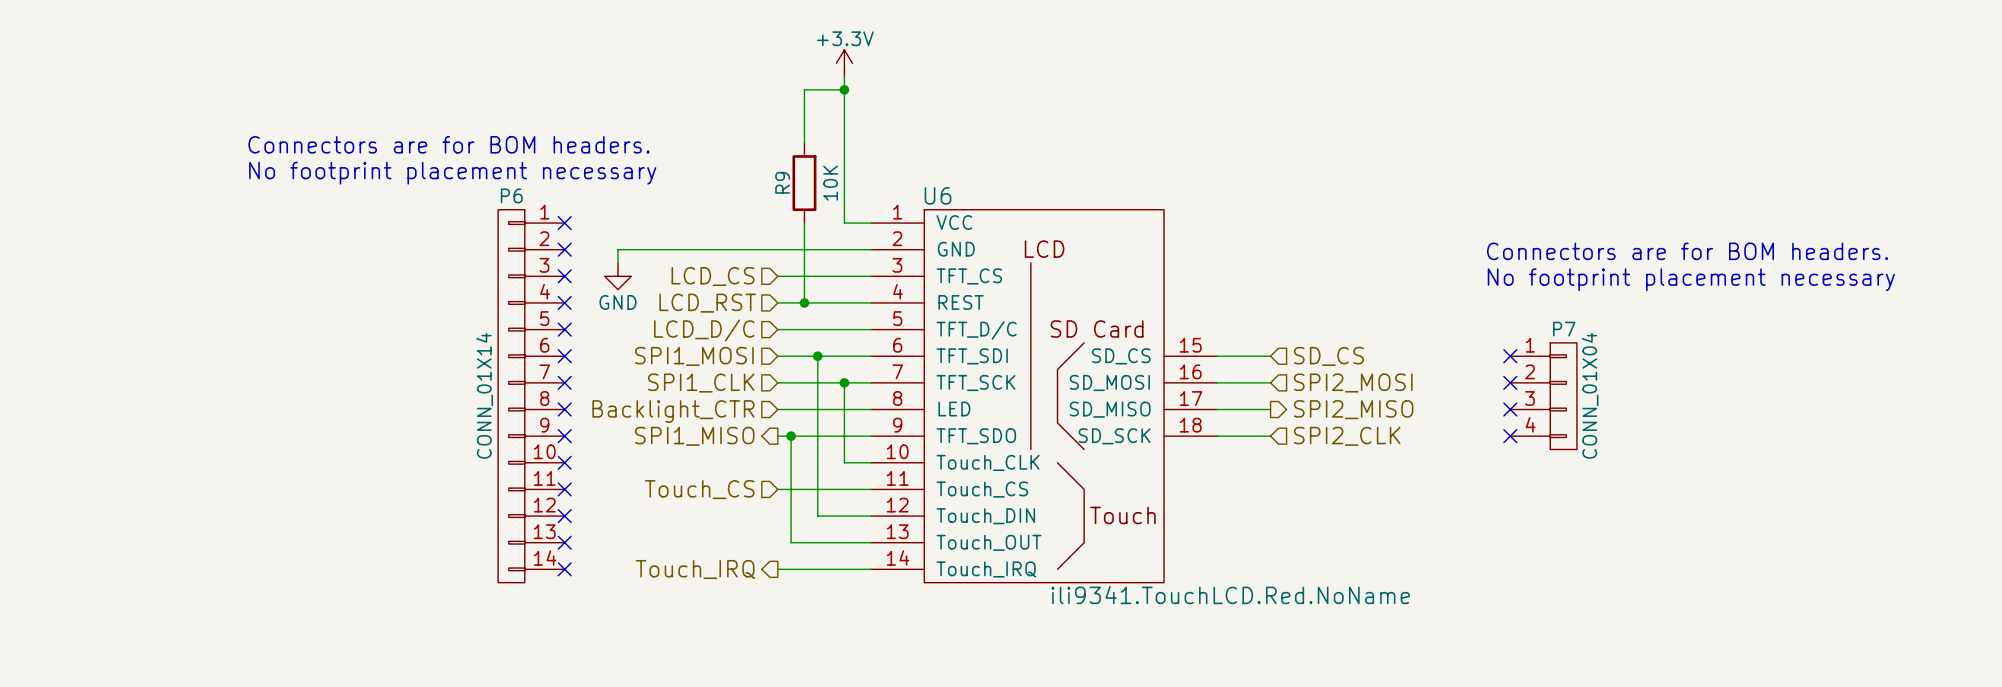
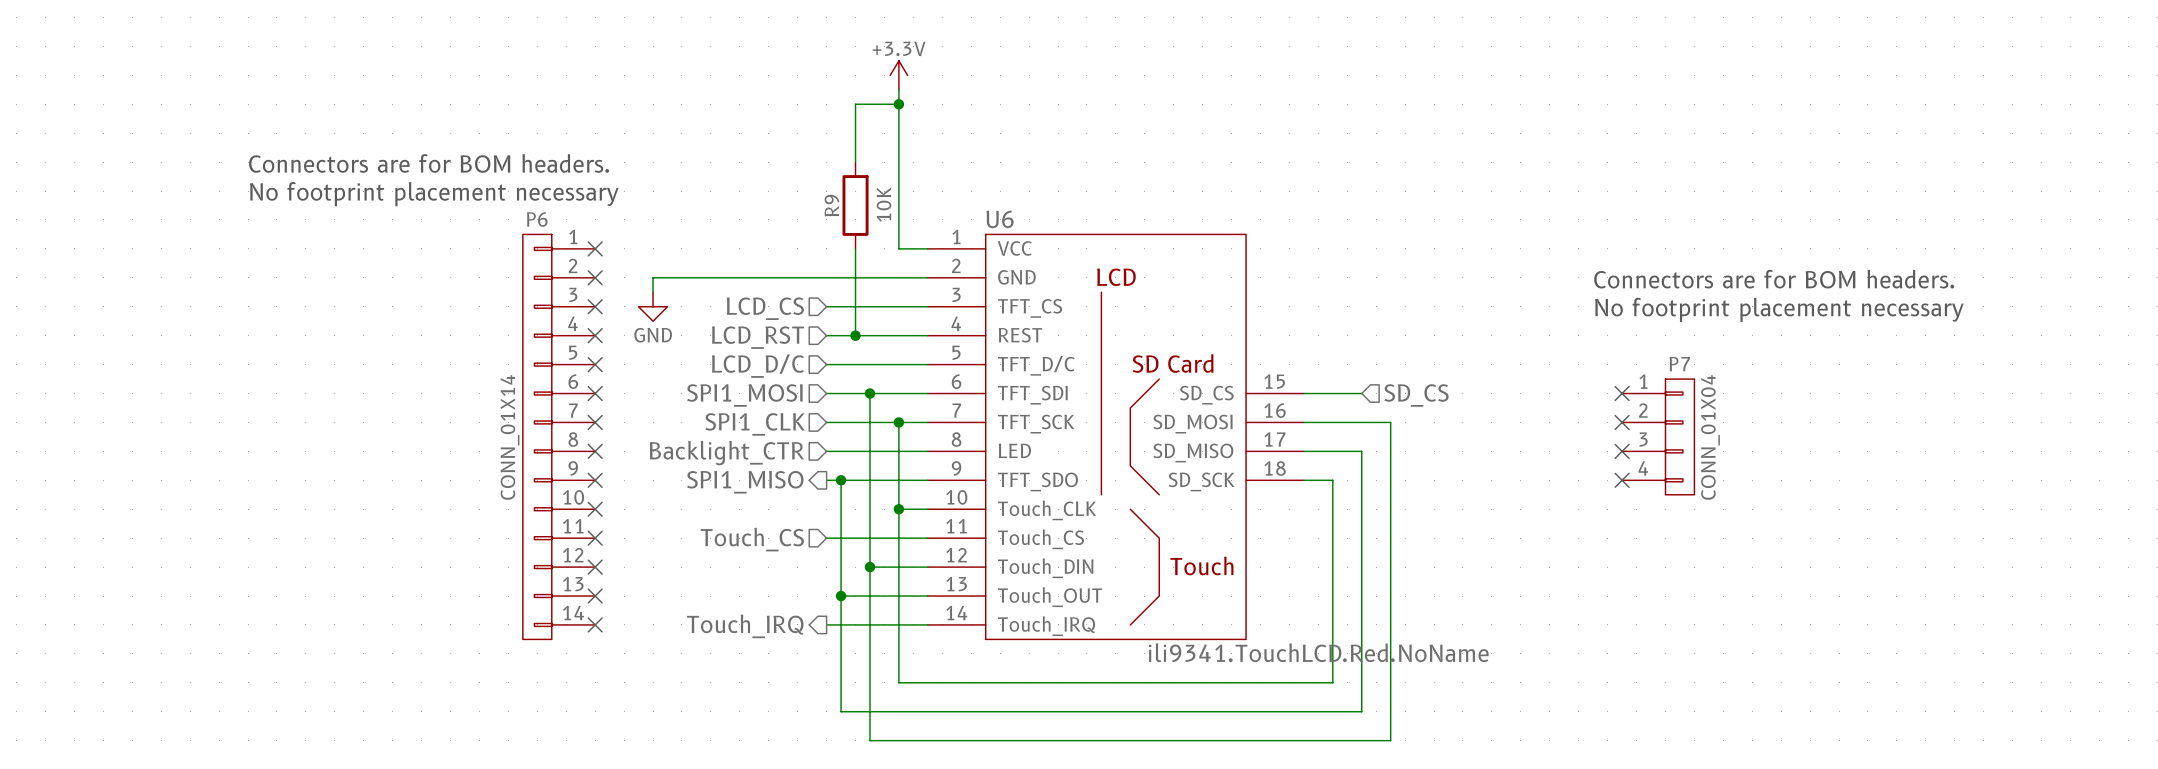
wire: none -> (1361, 422) (1390, 422) (1390, 740) (869, 740) (869, 567)
hierarchical label: SPI2_MOSI (1353, 383) -> none
wire: none -> (1361, 451) (1361, 711) (841, 711) (841, 596)
hierarchical label: SPI2_MISO (1353, 409) -> none
wire: (1243, 436) (1270, 436) -> (1332, 480) (1332, 682) (898, 682) (898, 509)
hierarchical label: SPI2_CLK (1347, 436) -> none
junction: none -> (898, 509)
junction: none -> (869, 567)
junction: none -> (841, 596)

